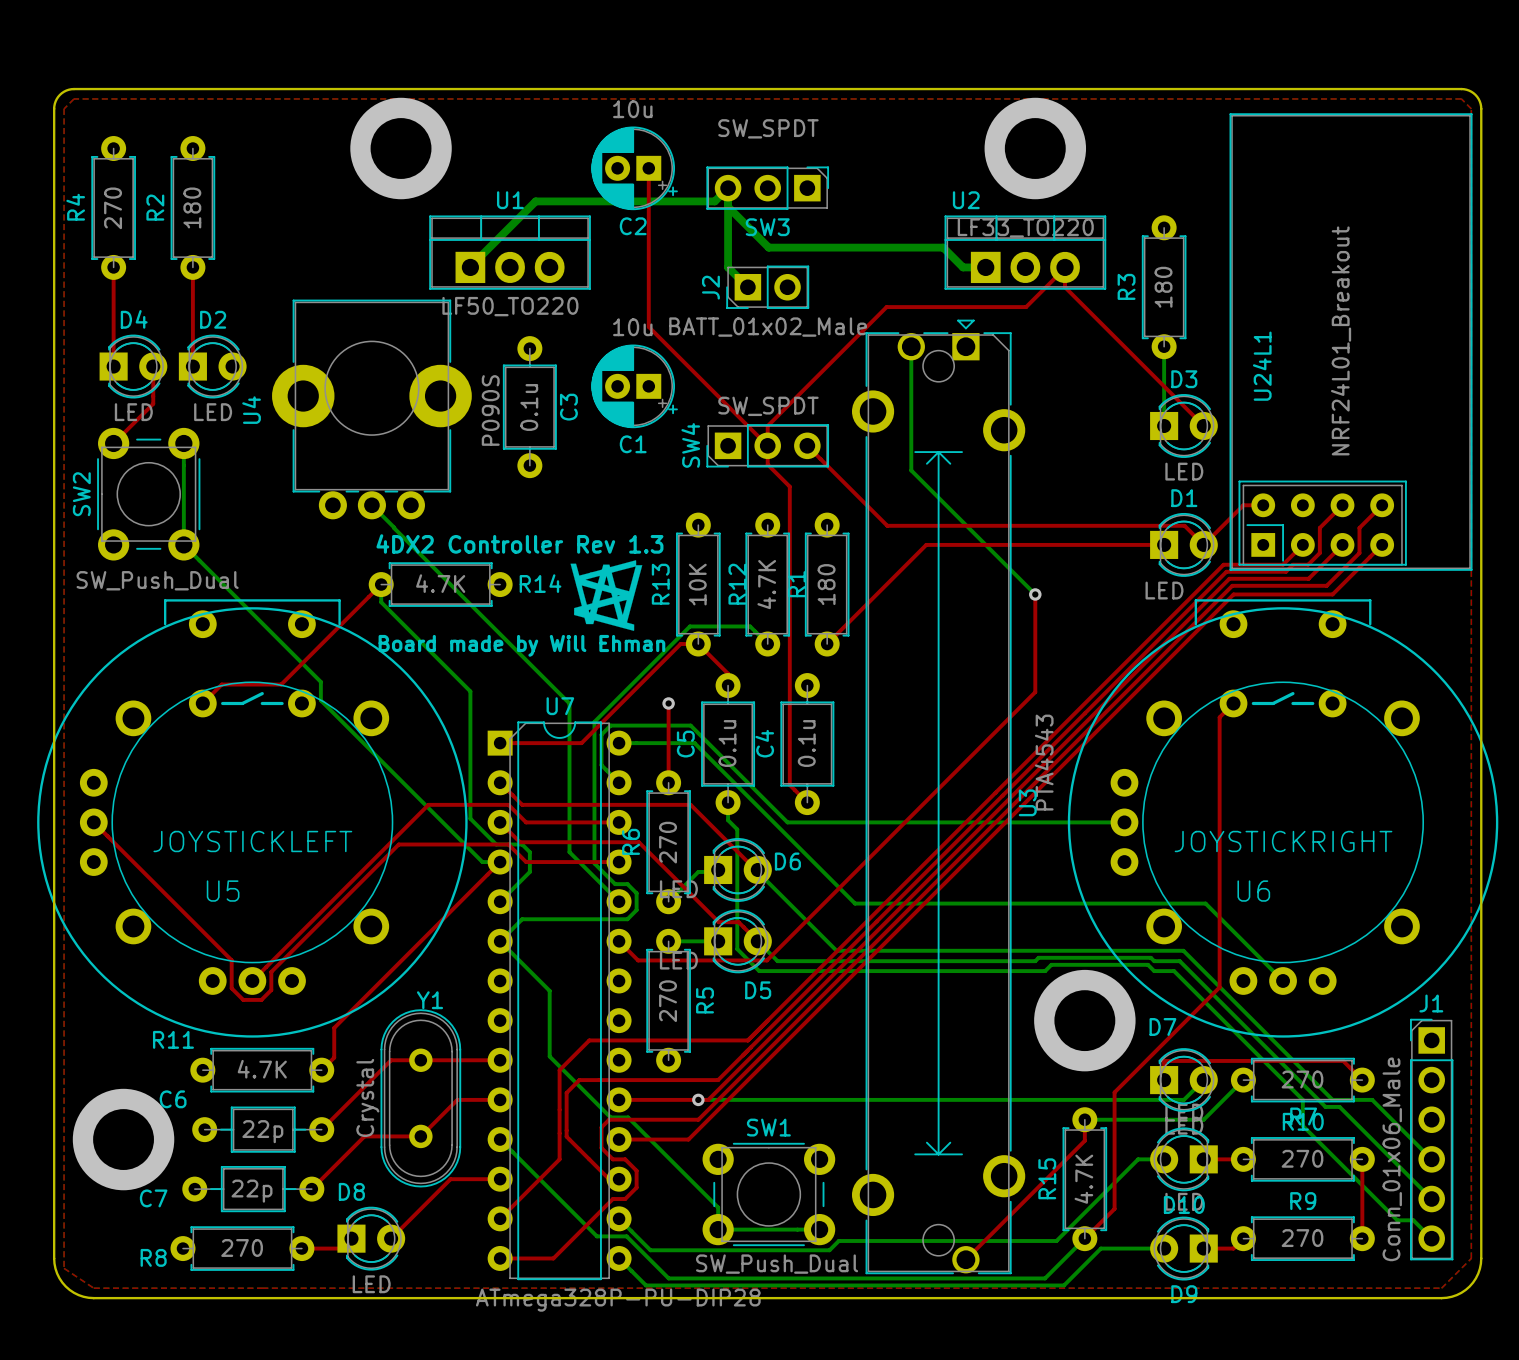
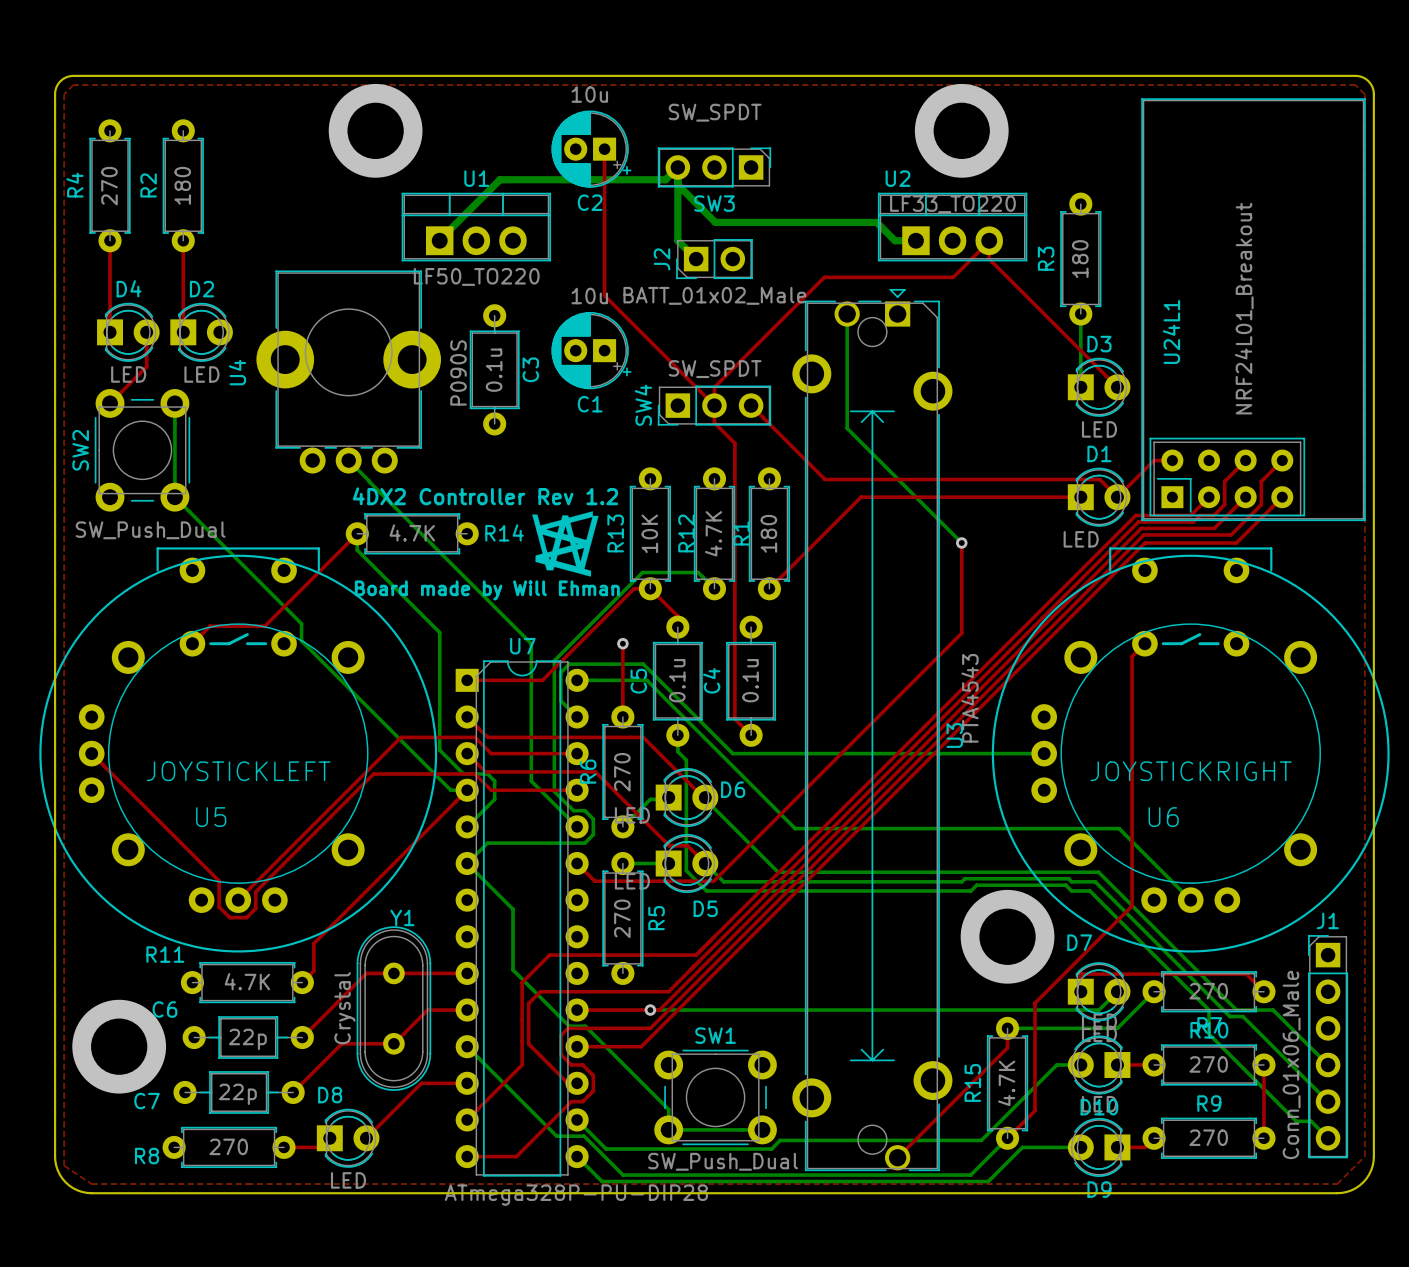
text: 4DX2 Controller Rev 1.3 (519, 543) -> 4DX2 Controller Rev 1.2 (485, 496)

